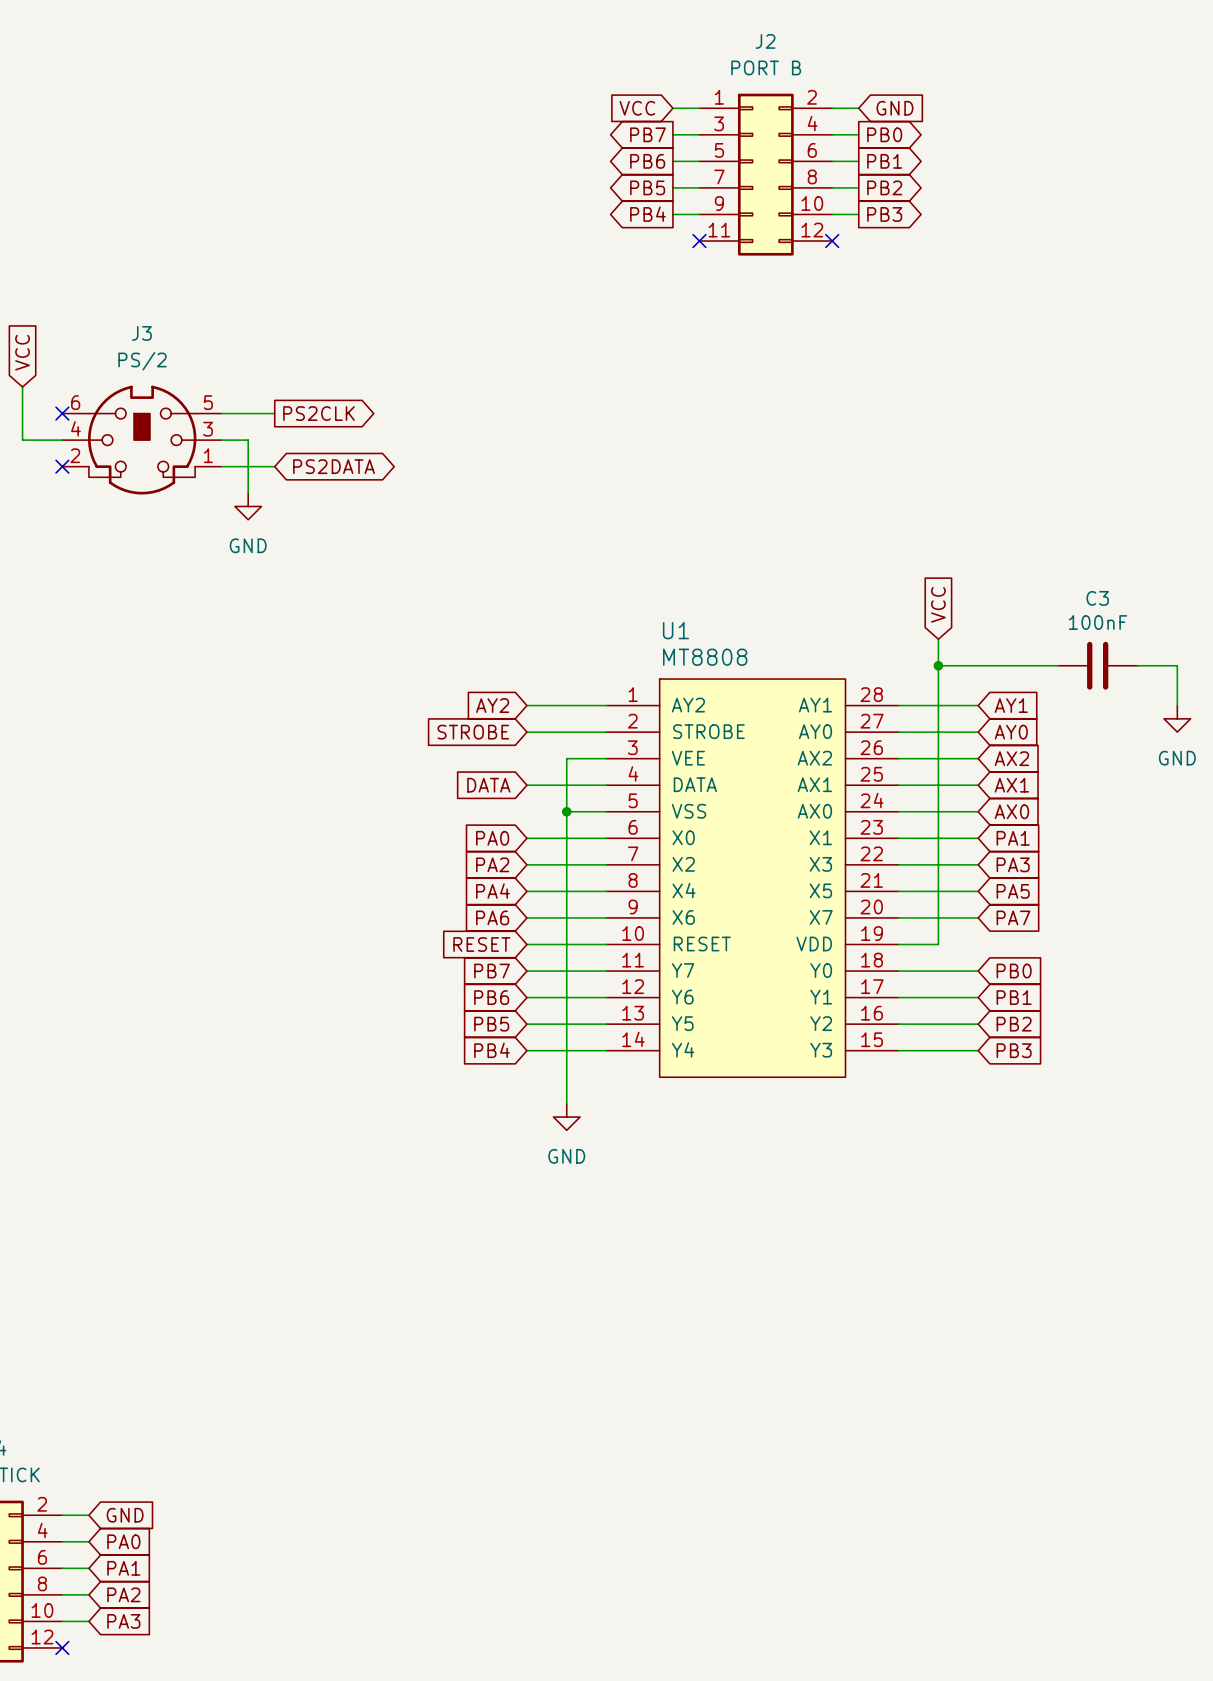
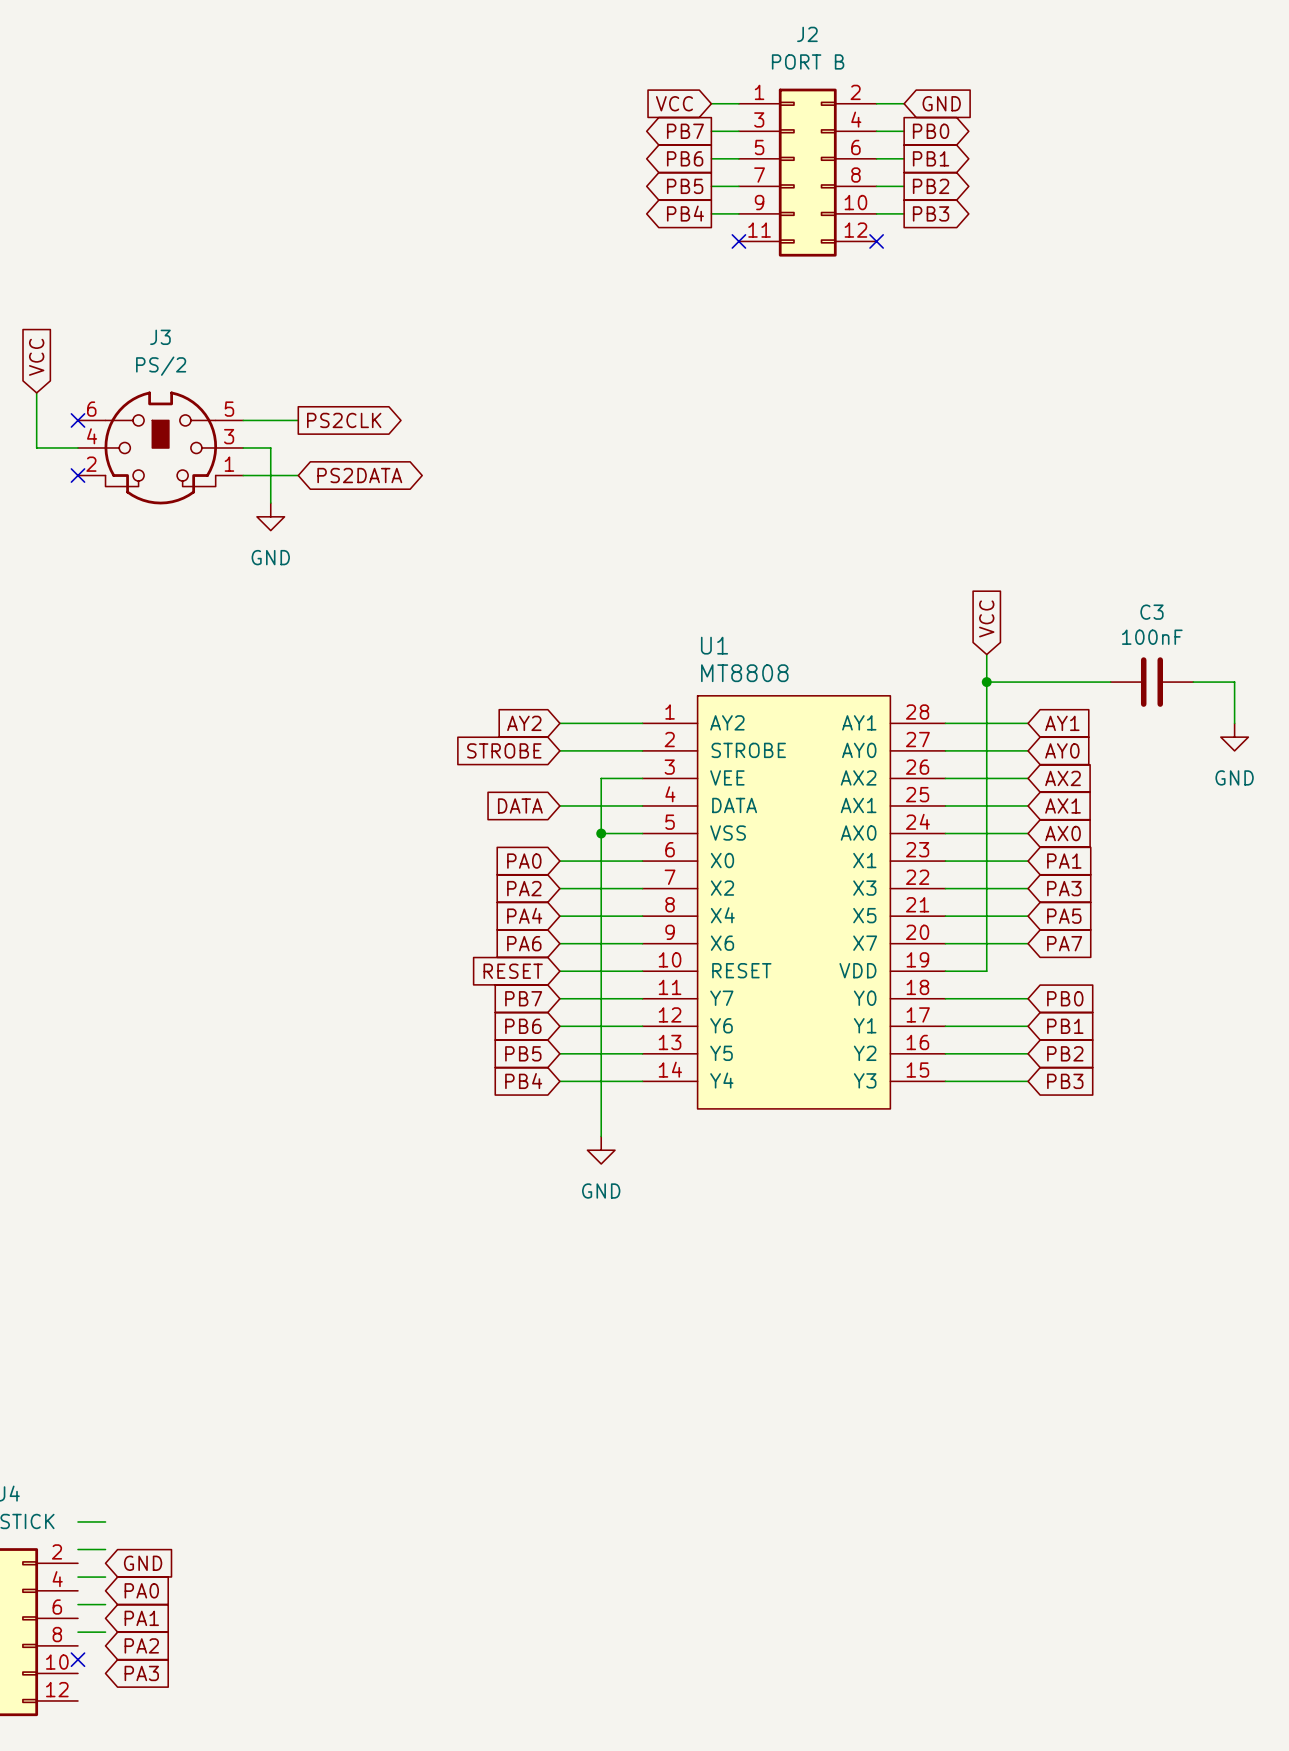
wire: (62, 1515) (88, 1515) -> (77, 1521) (105, 1521)
wire: (62, 1541) (88, 1541) -> (77, 1549) (105, 1549)
wire: (62, 1568) (88, 1568) -> (77, 1577) (105, 1577)
wire: (62, 1594) (88, 1594) -> (77, 1604) (105, 1604)
wire: (62, 1621) (88, 1621) -> (77, 1632) (105, 1632)
no-connect mark position: (62, 1647) -> (77, 1659)

